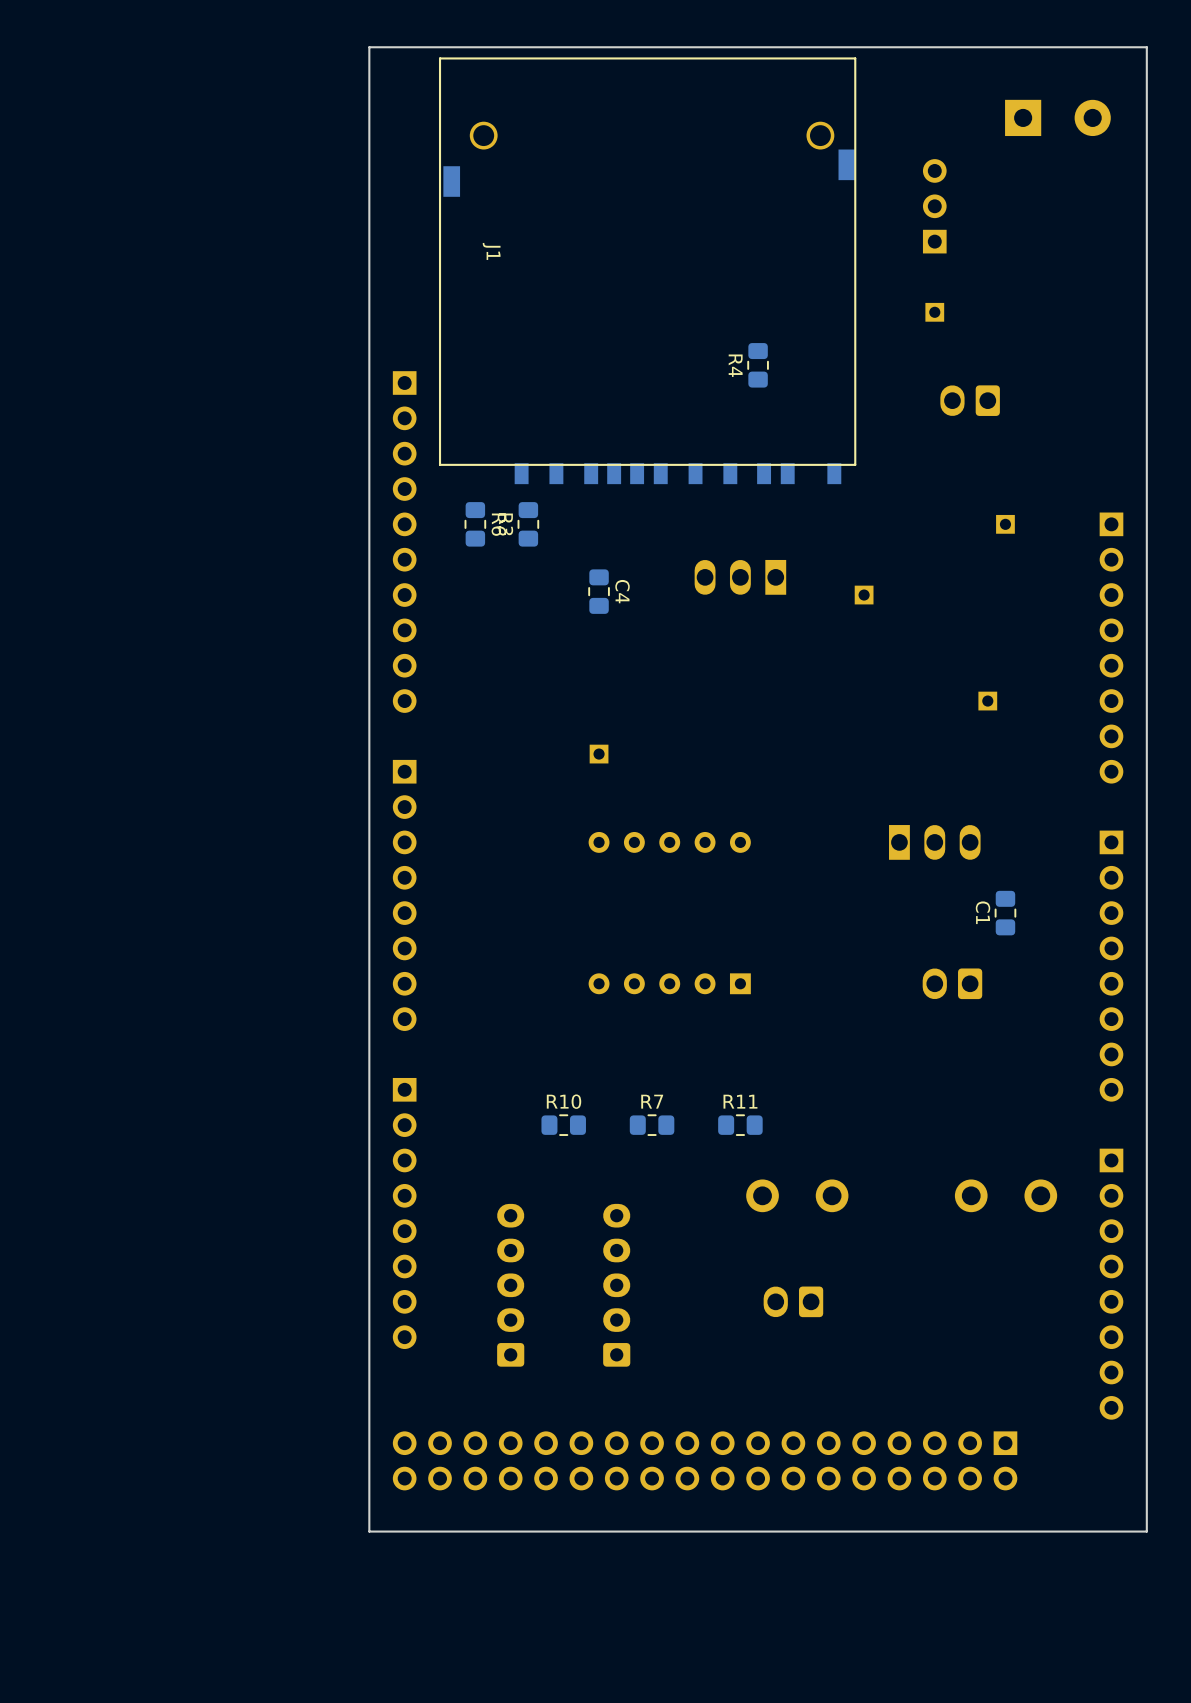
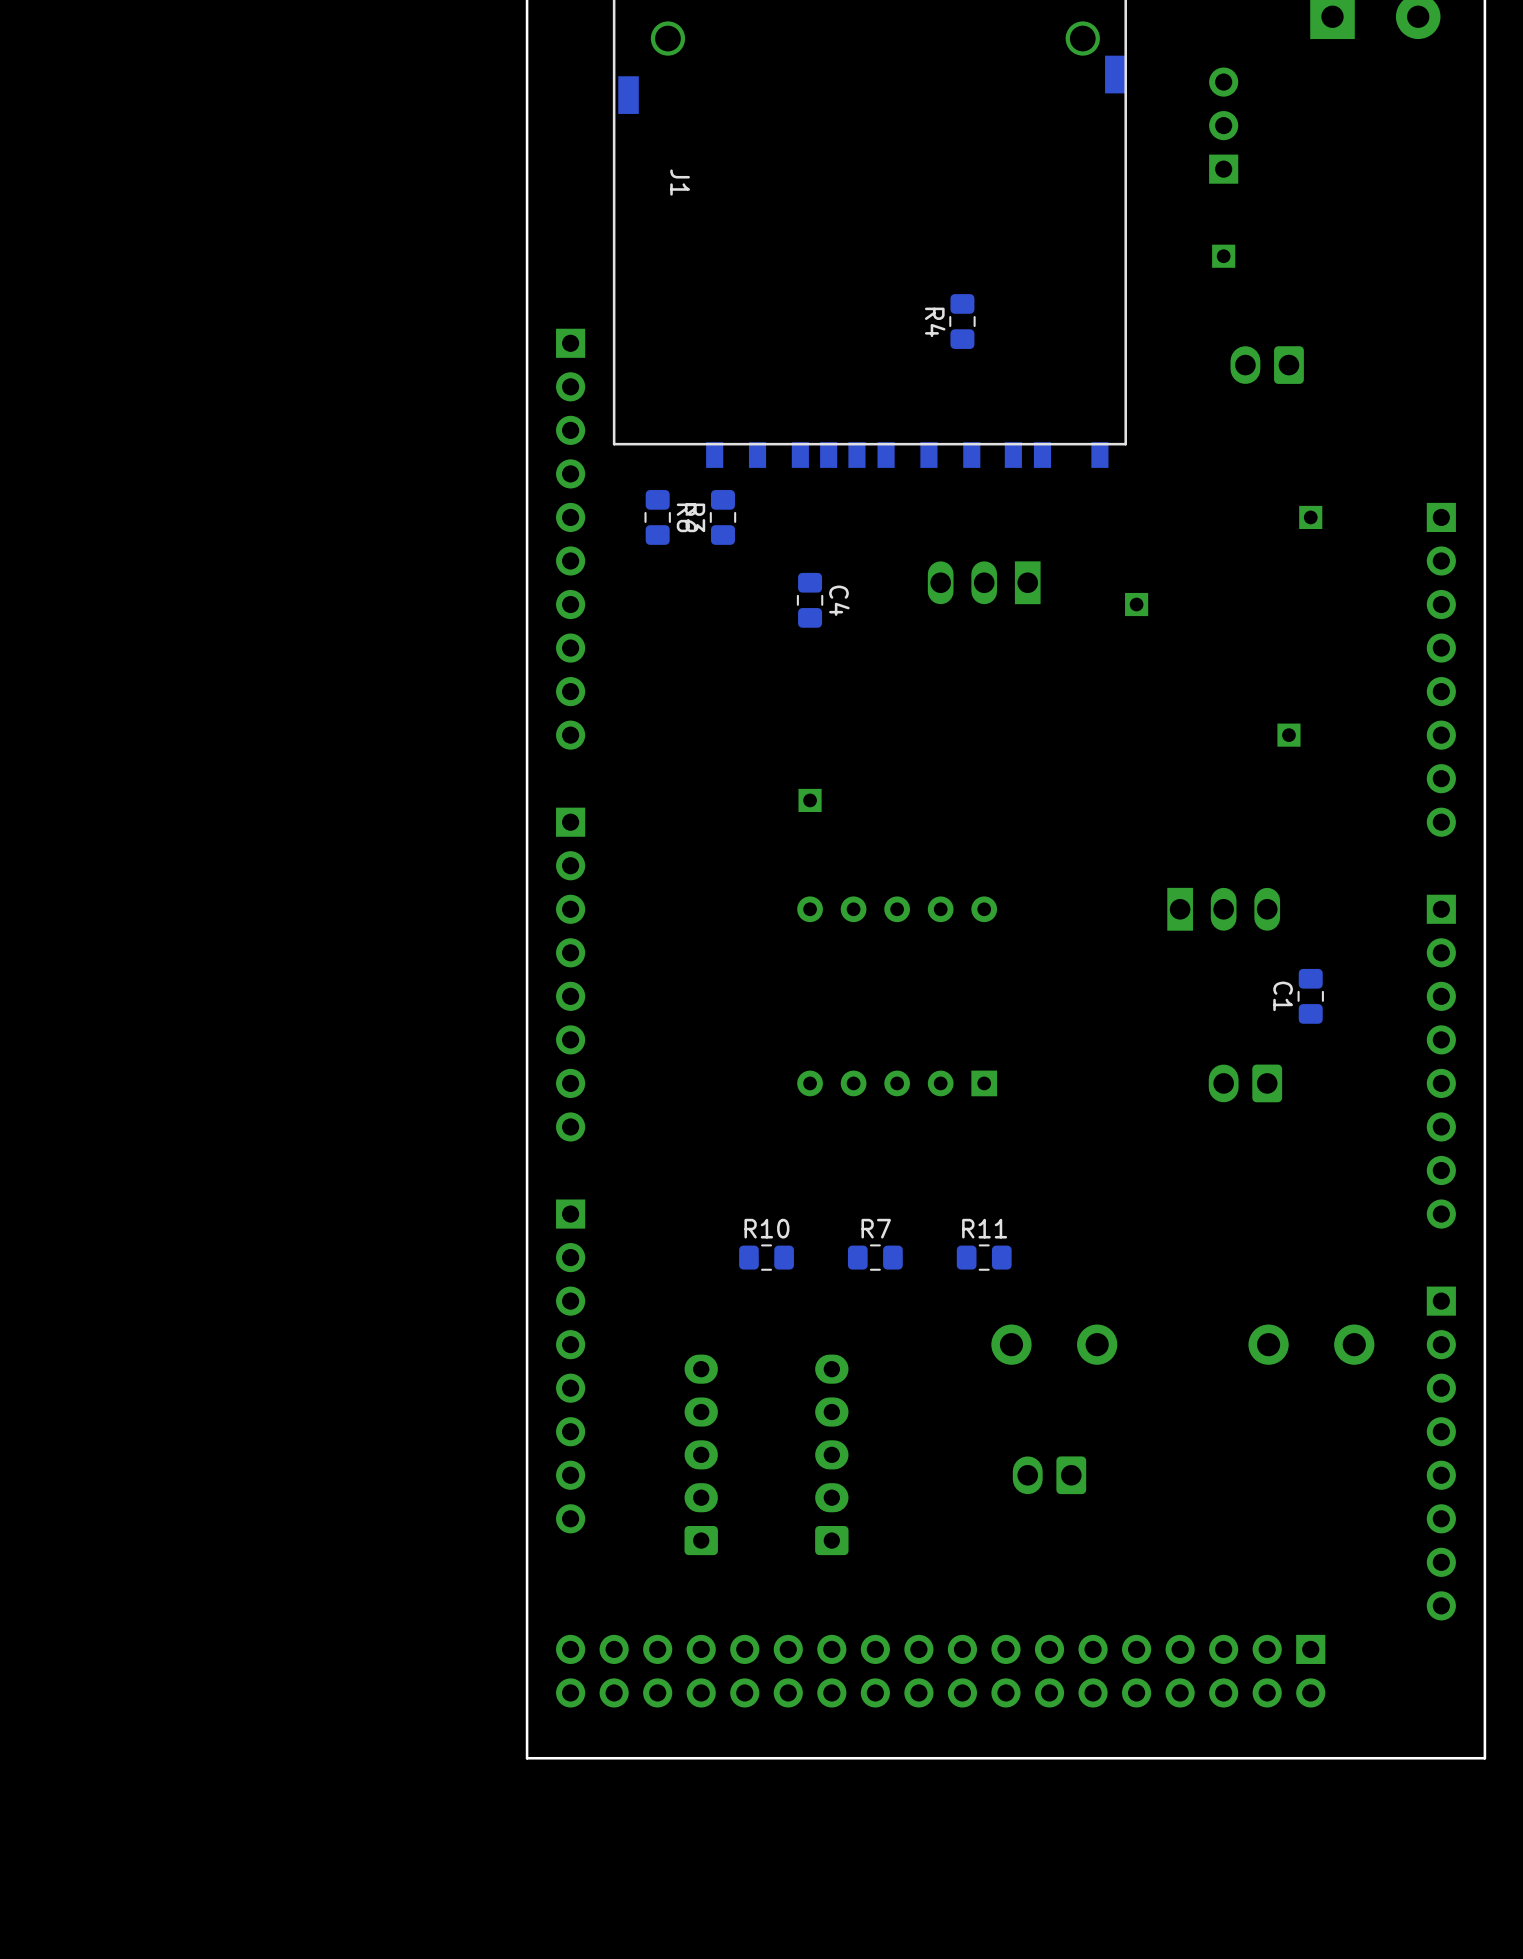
R4 position: (758, 365) -> (962, 321)

